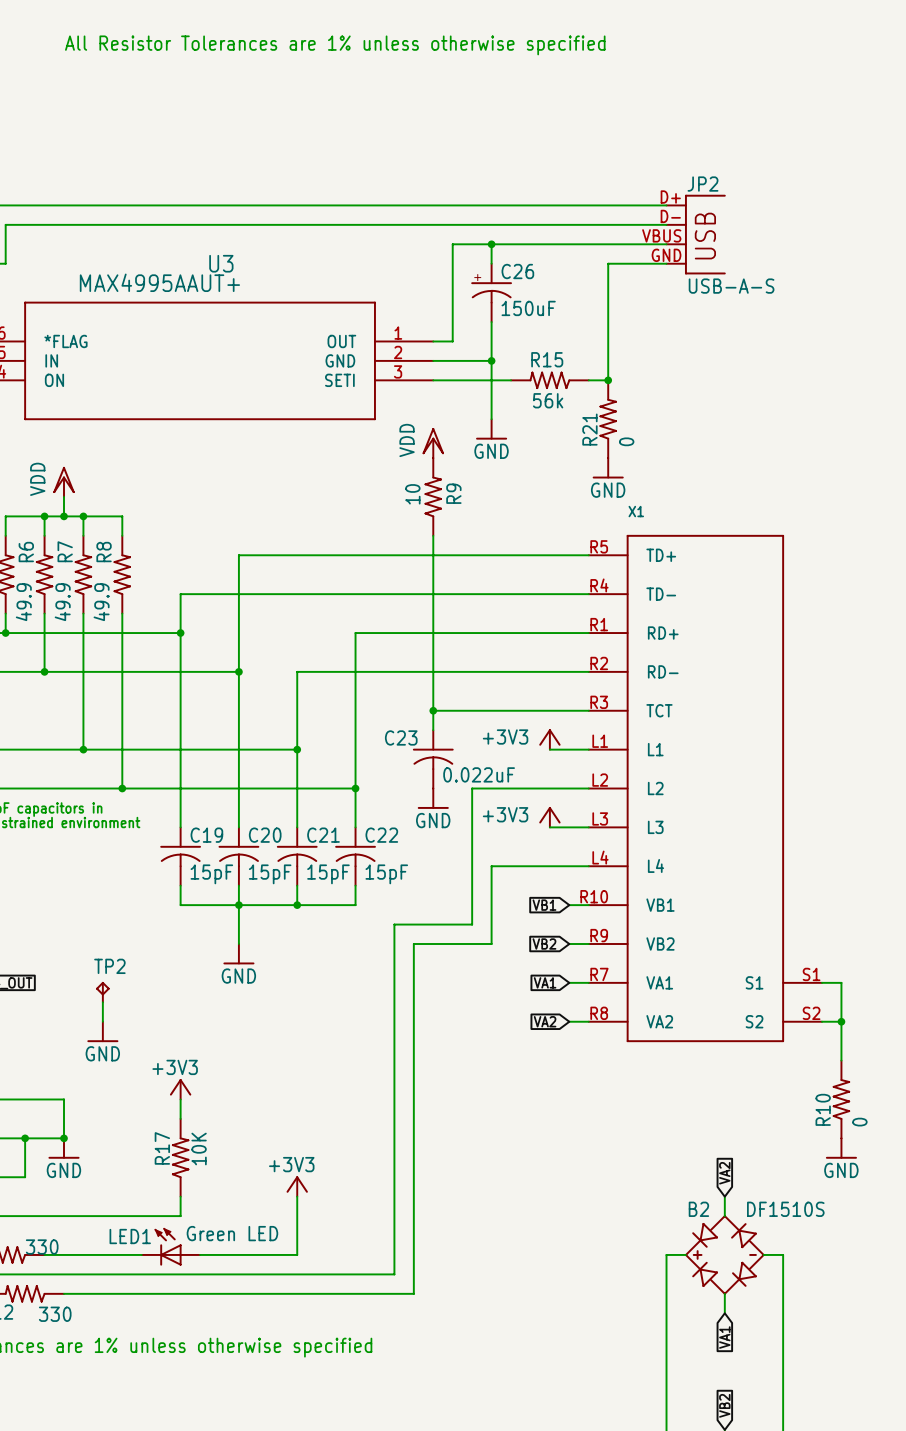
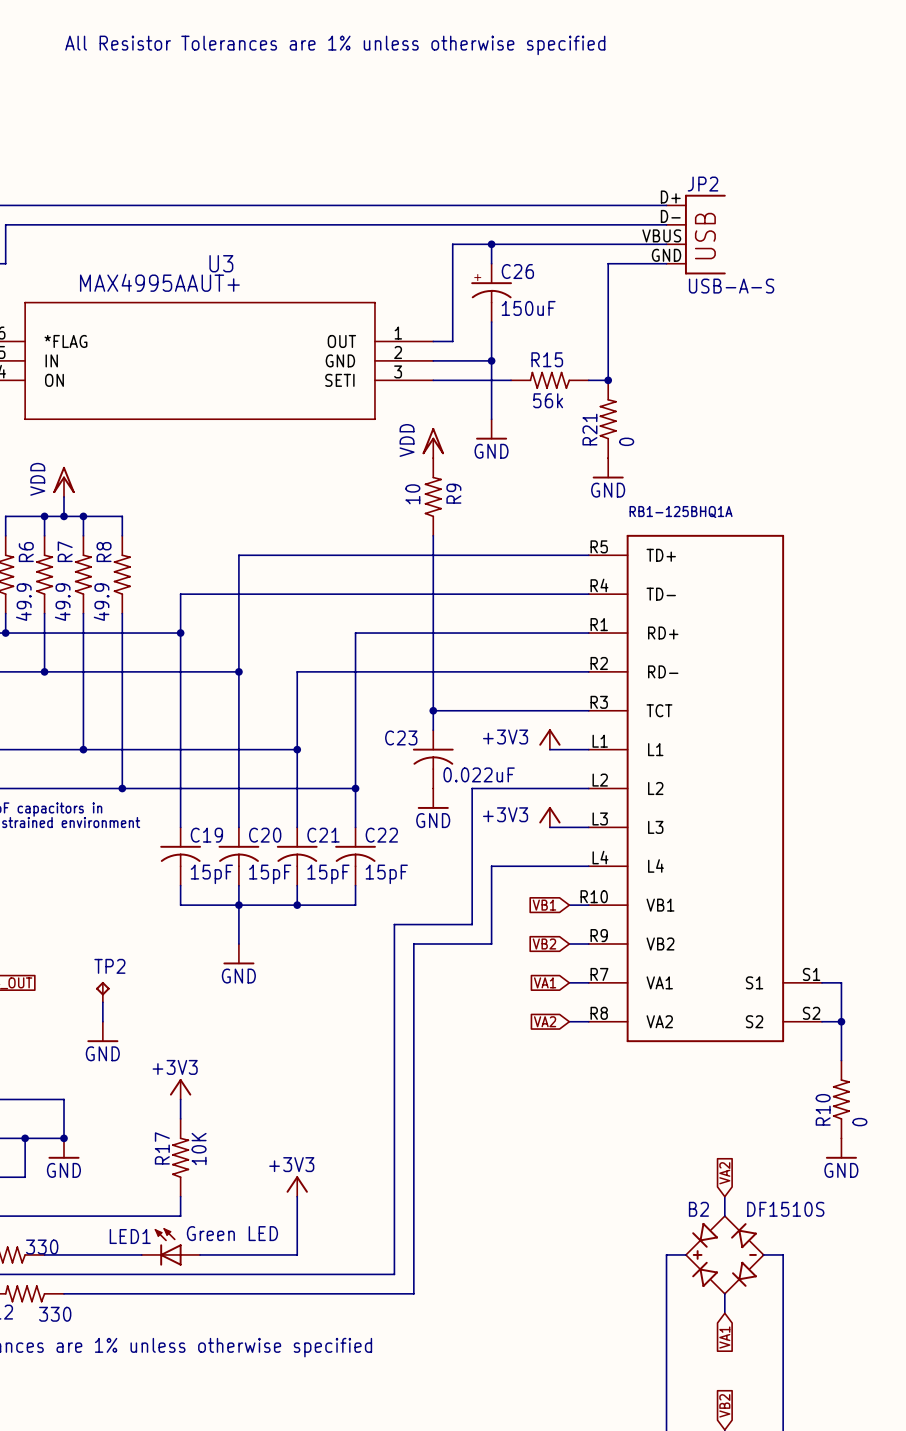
X1 name: X1 (636, 511) -> RB1-125BHQ1A (681, 512)

